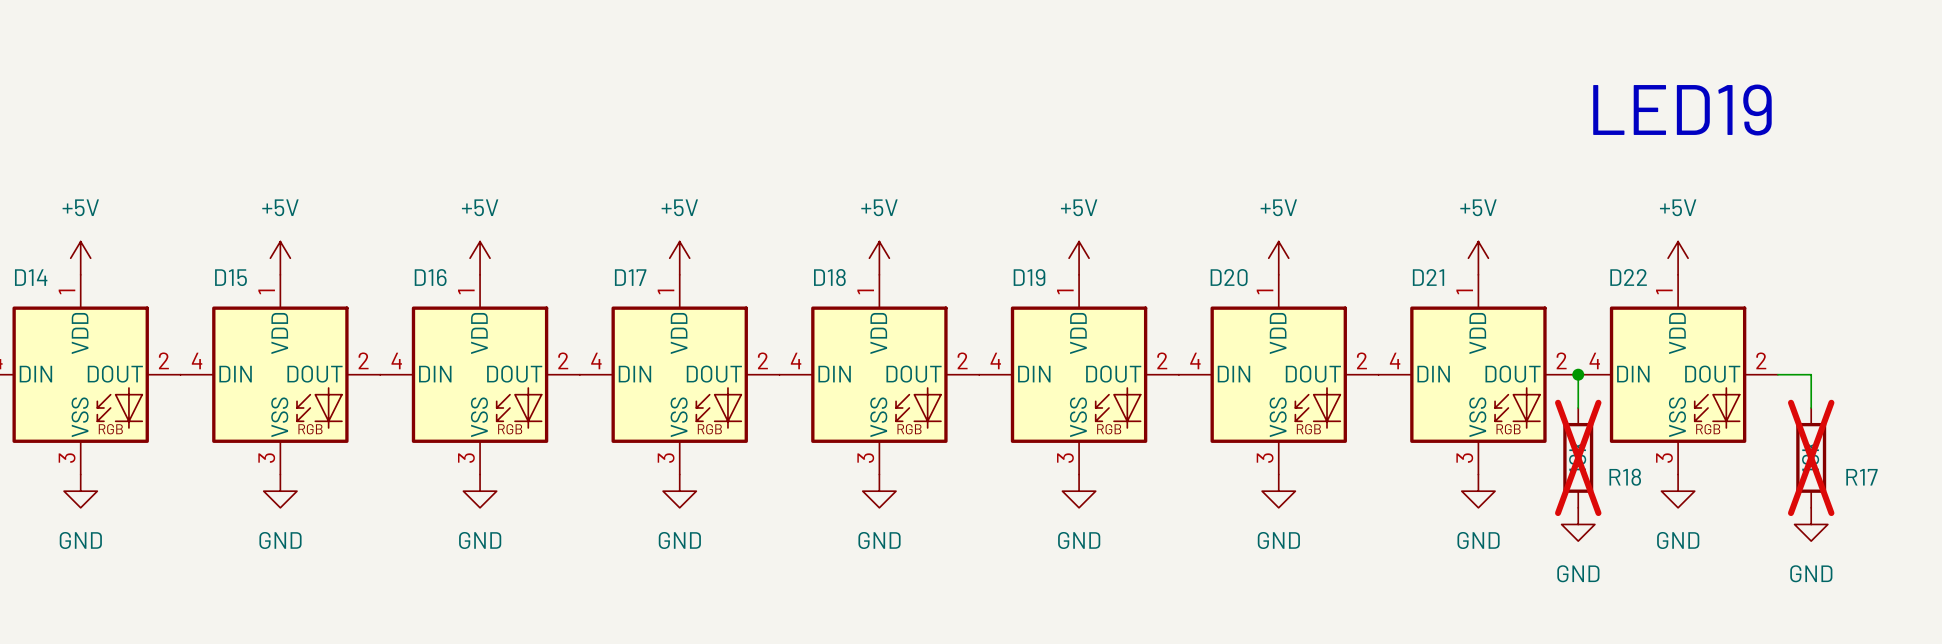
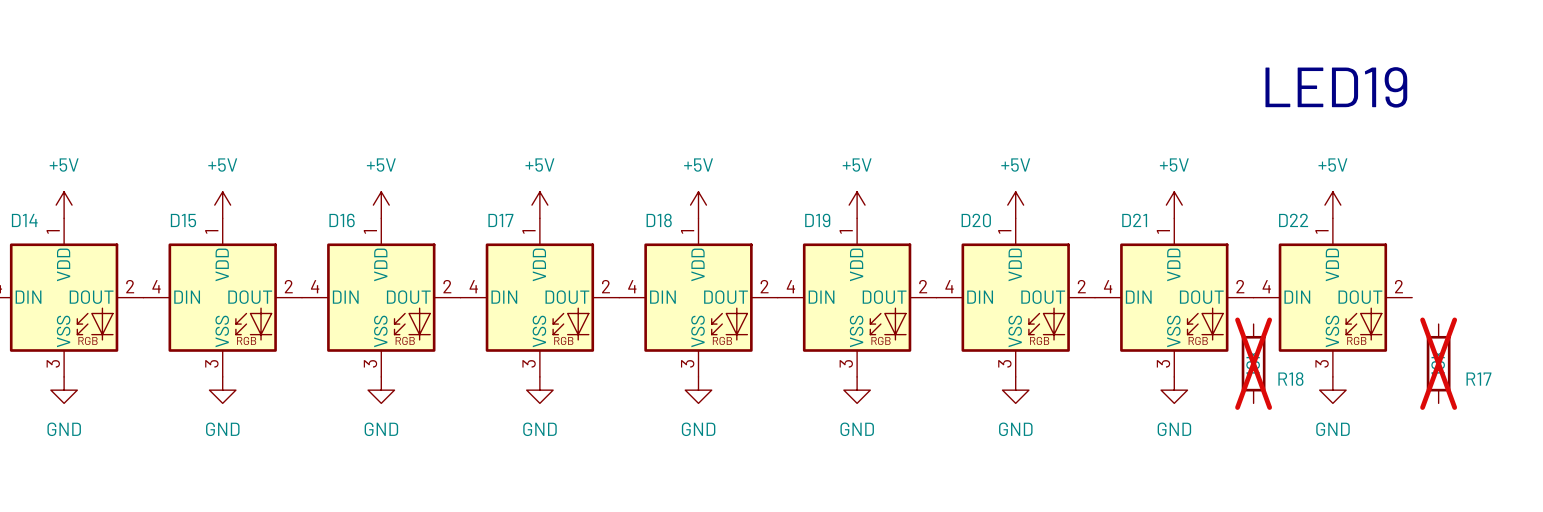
wire: (1578, 374) (1578, 407) -> none
junction: (1578, 374) -> none
wire: (1777, 374) (1811, 374) (1811, 407) -> none
power symbol: GND (1578, 524) -> none
power symbol: GND (1811, 524) -> none

